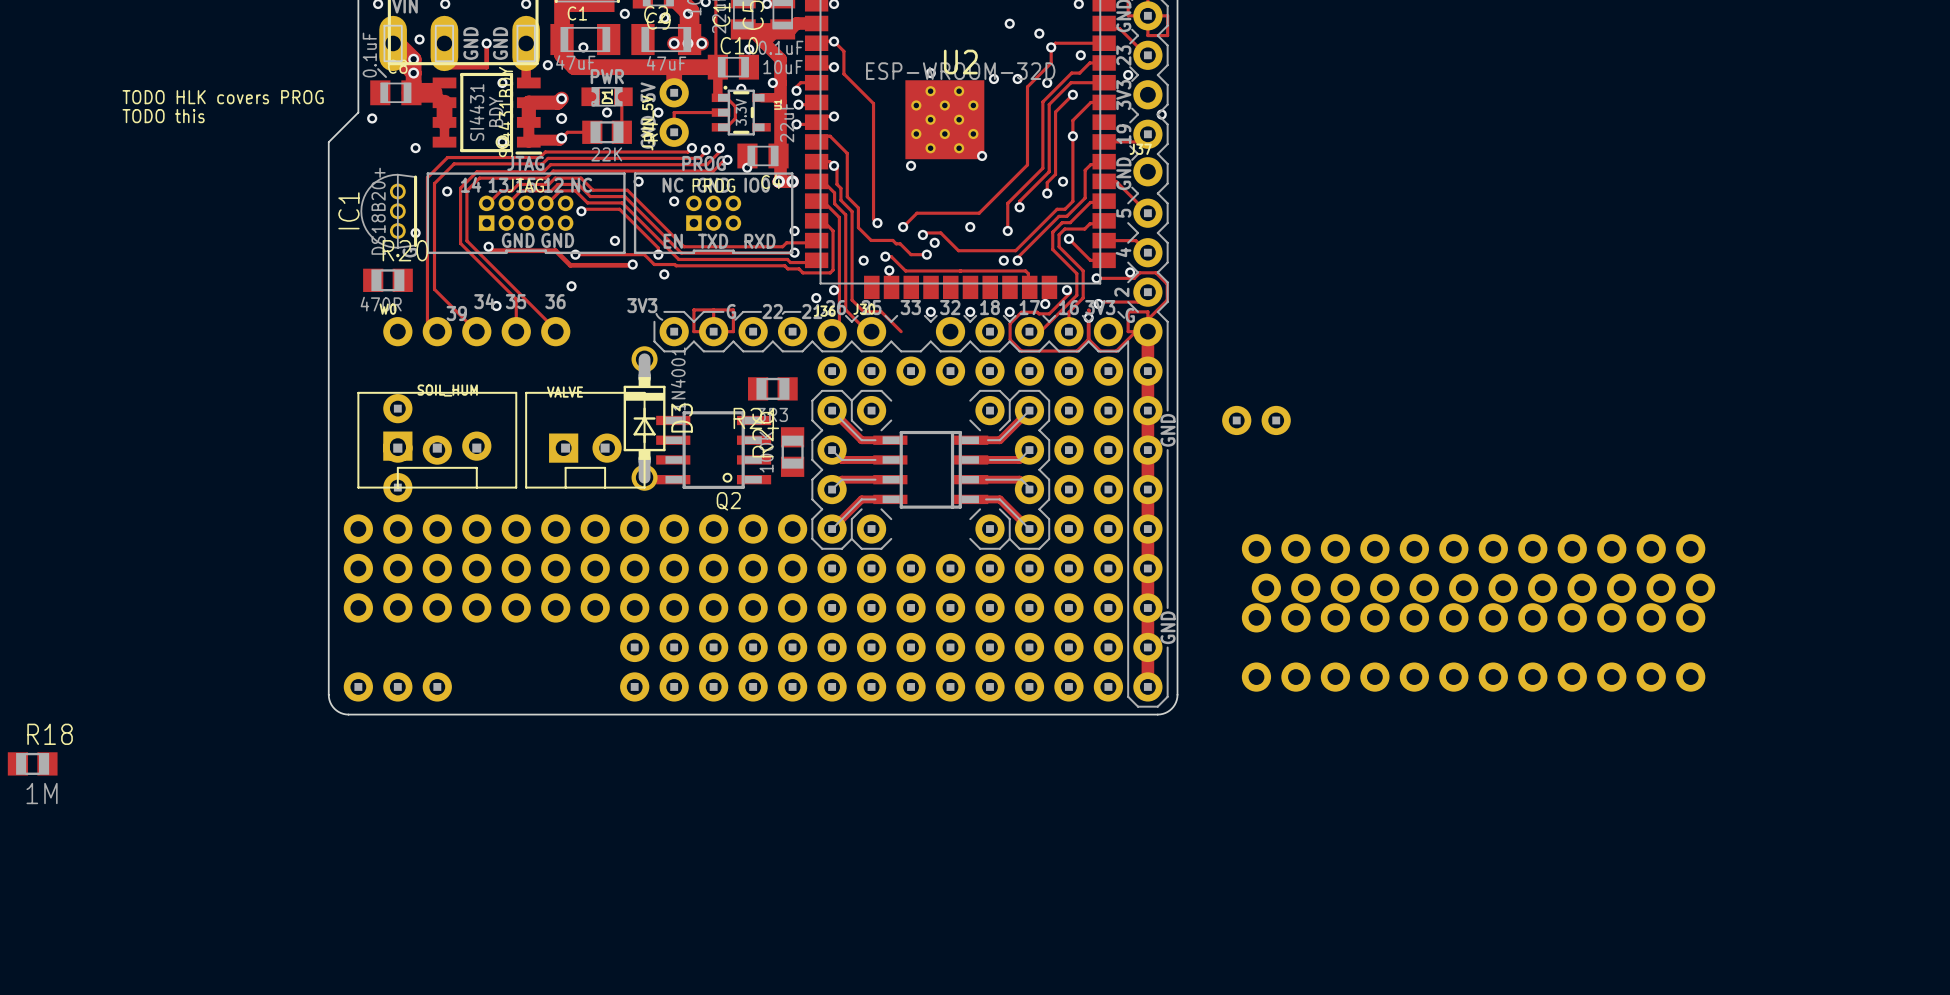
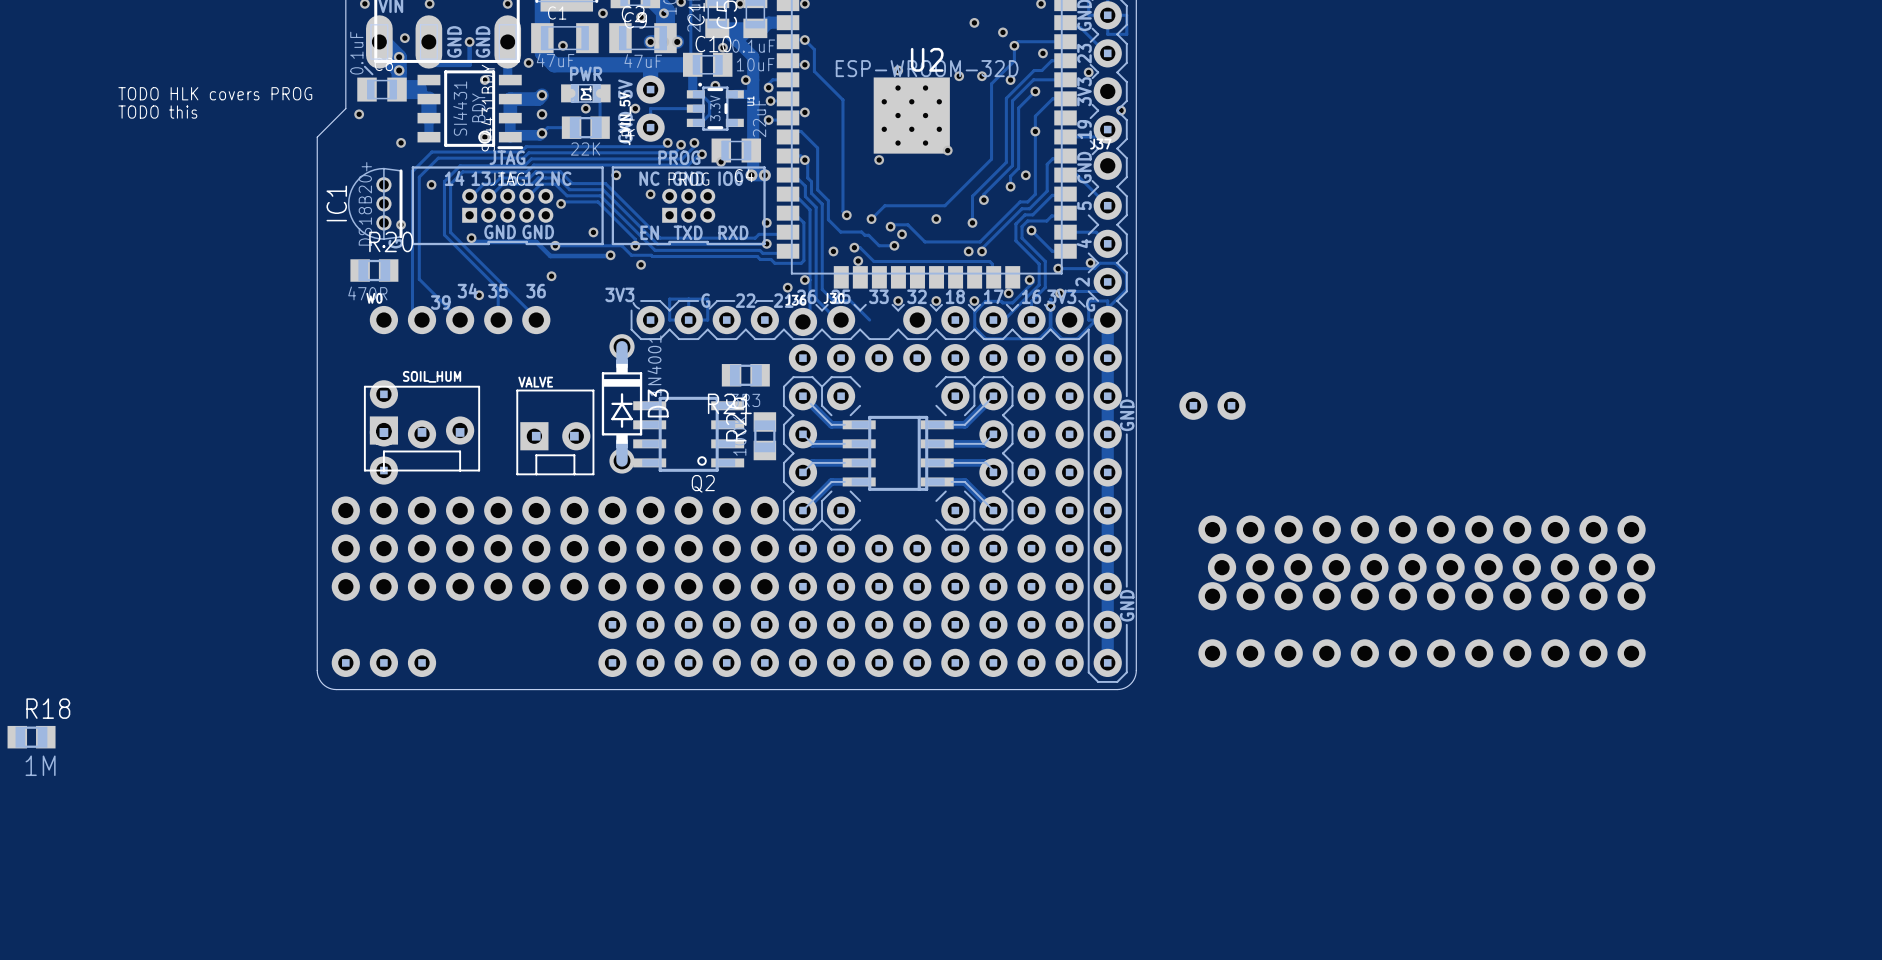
SOIL_HUM footprint: [357, 391, 518, 489] -> [363, 385, 481, 472]
VALVE footprint: [525, 391, 646, 489] -> [516, 389, 595, 476]

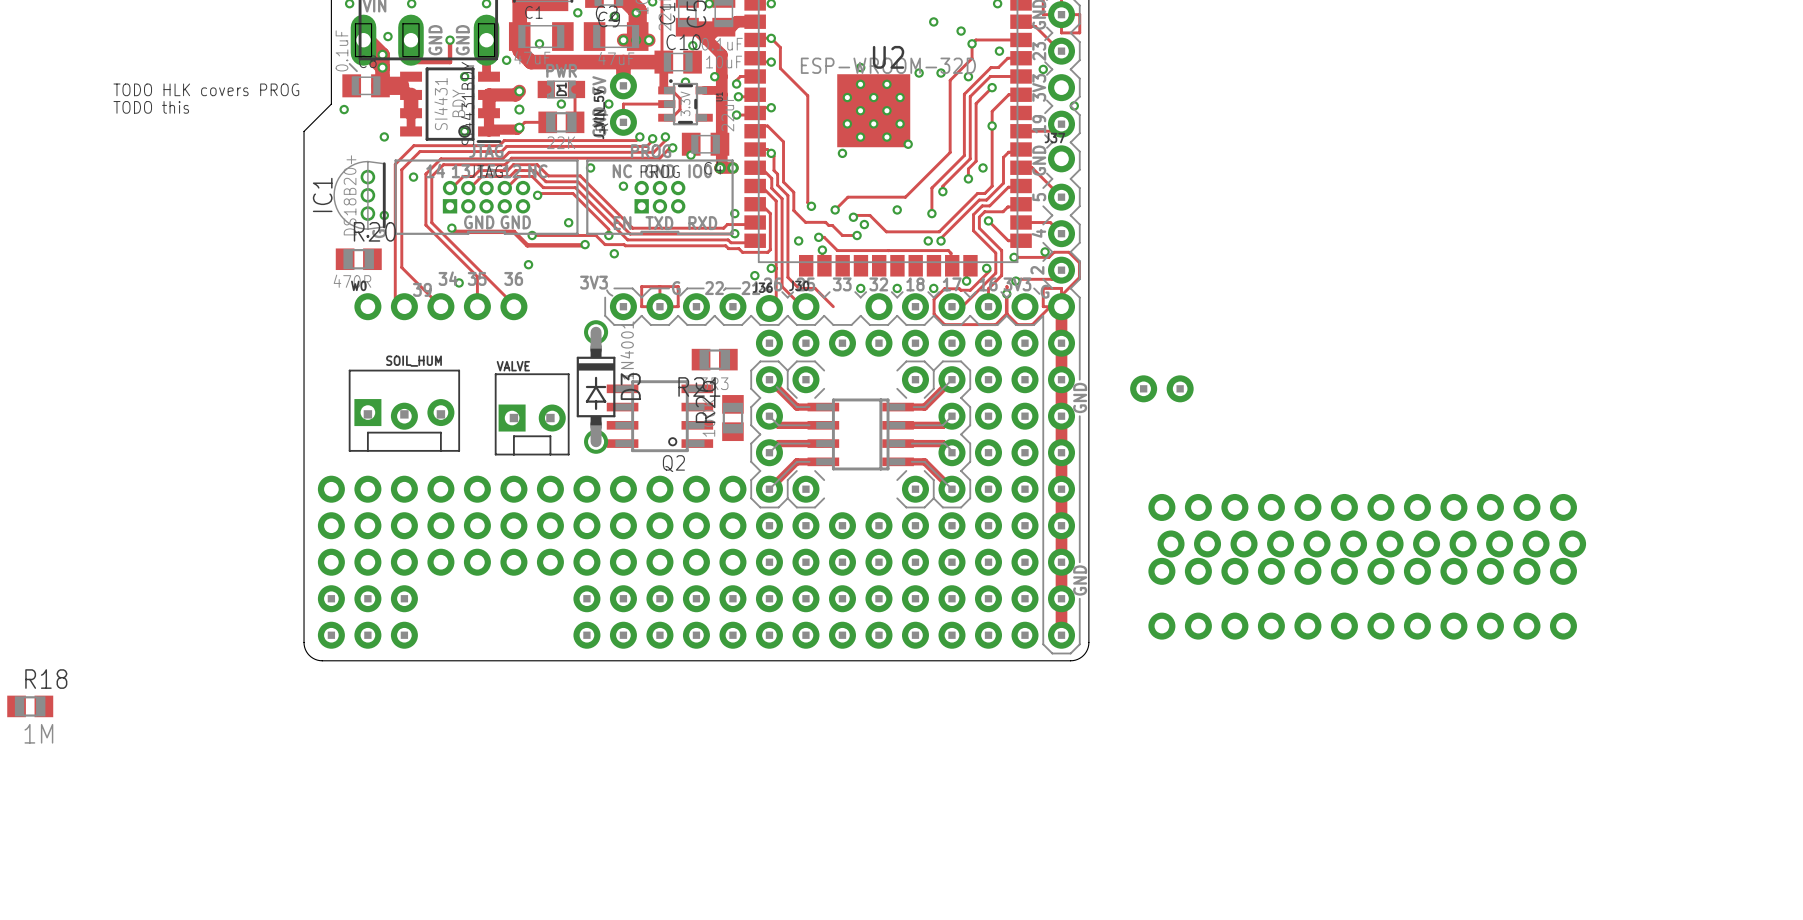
part rotation: 0° (383, 432) -> 90° clockwise (367, 598)
part position: (383, 432) -> (367, 598)

